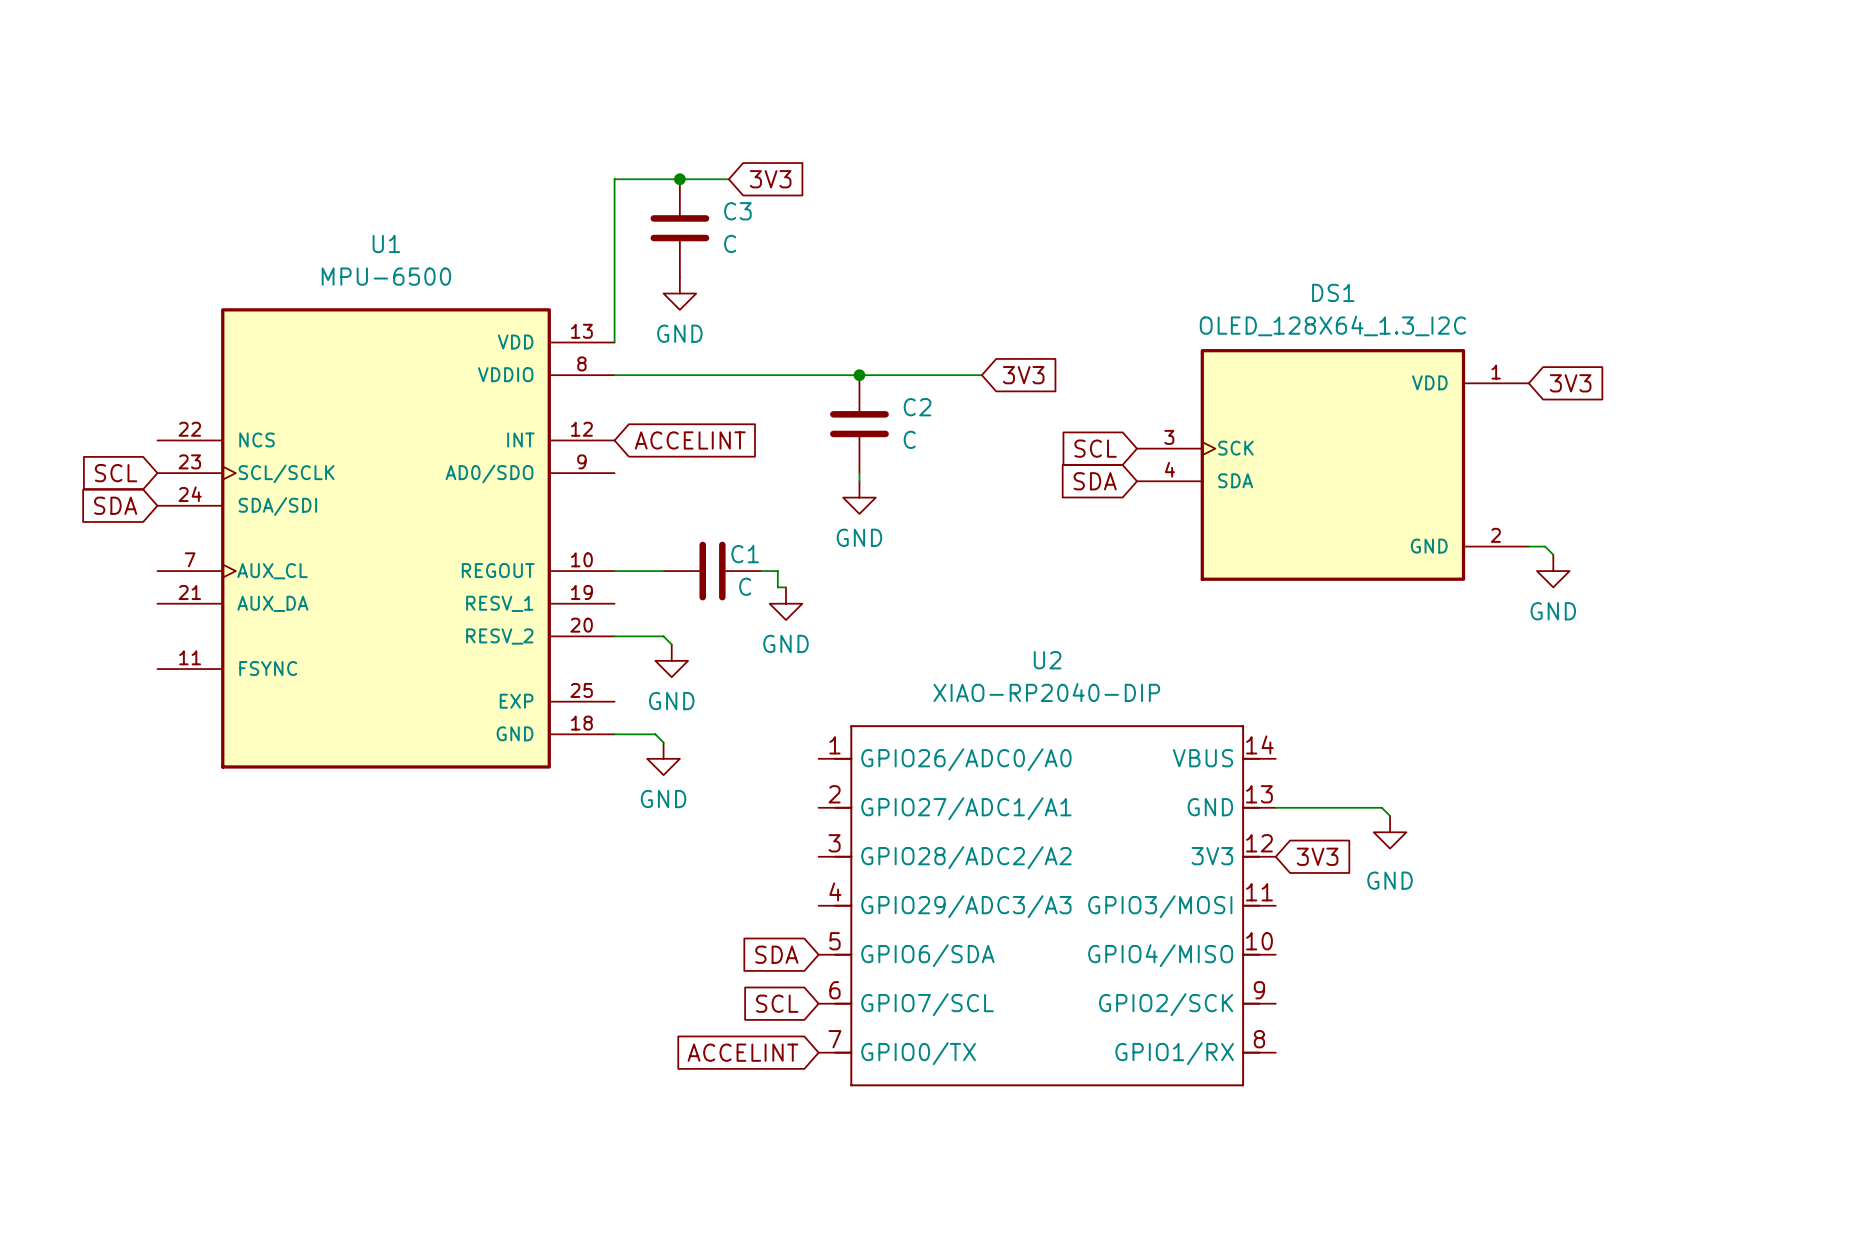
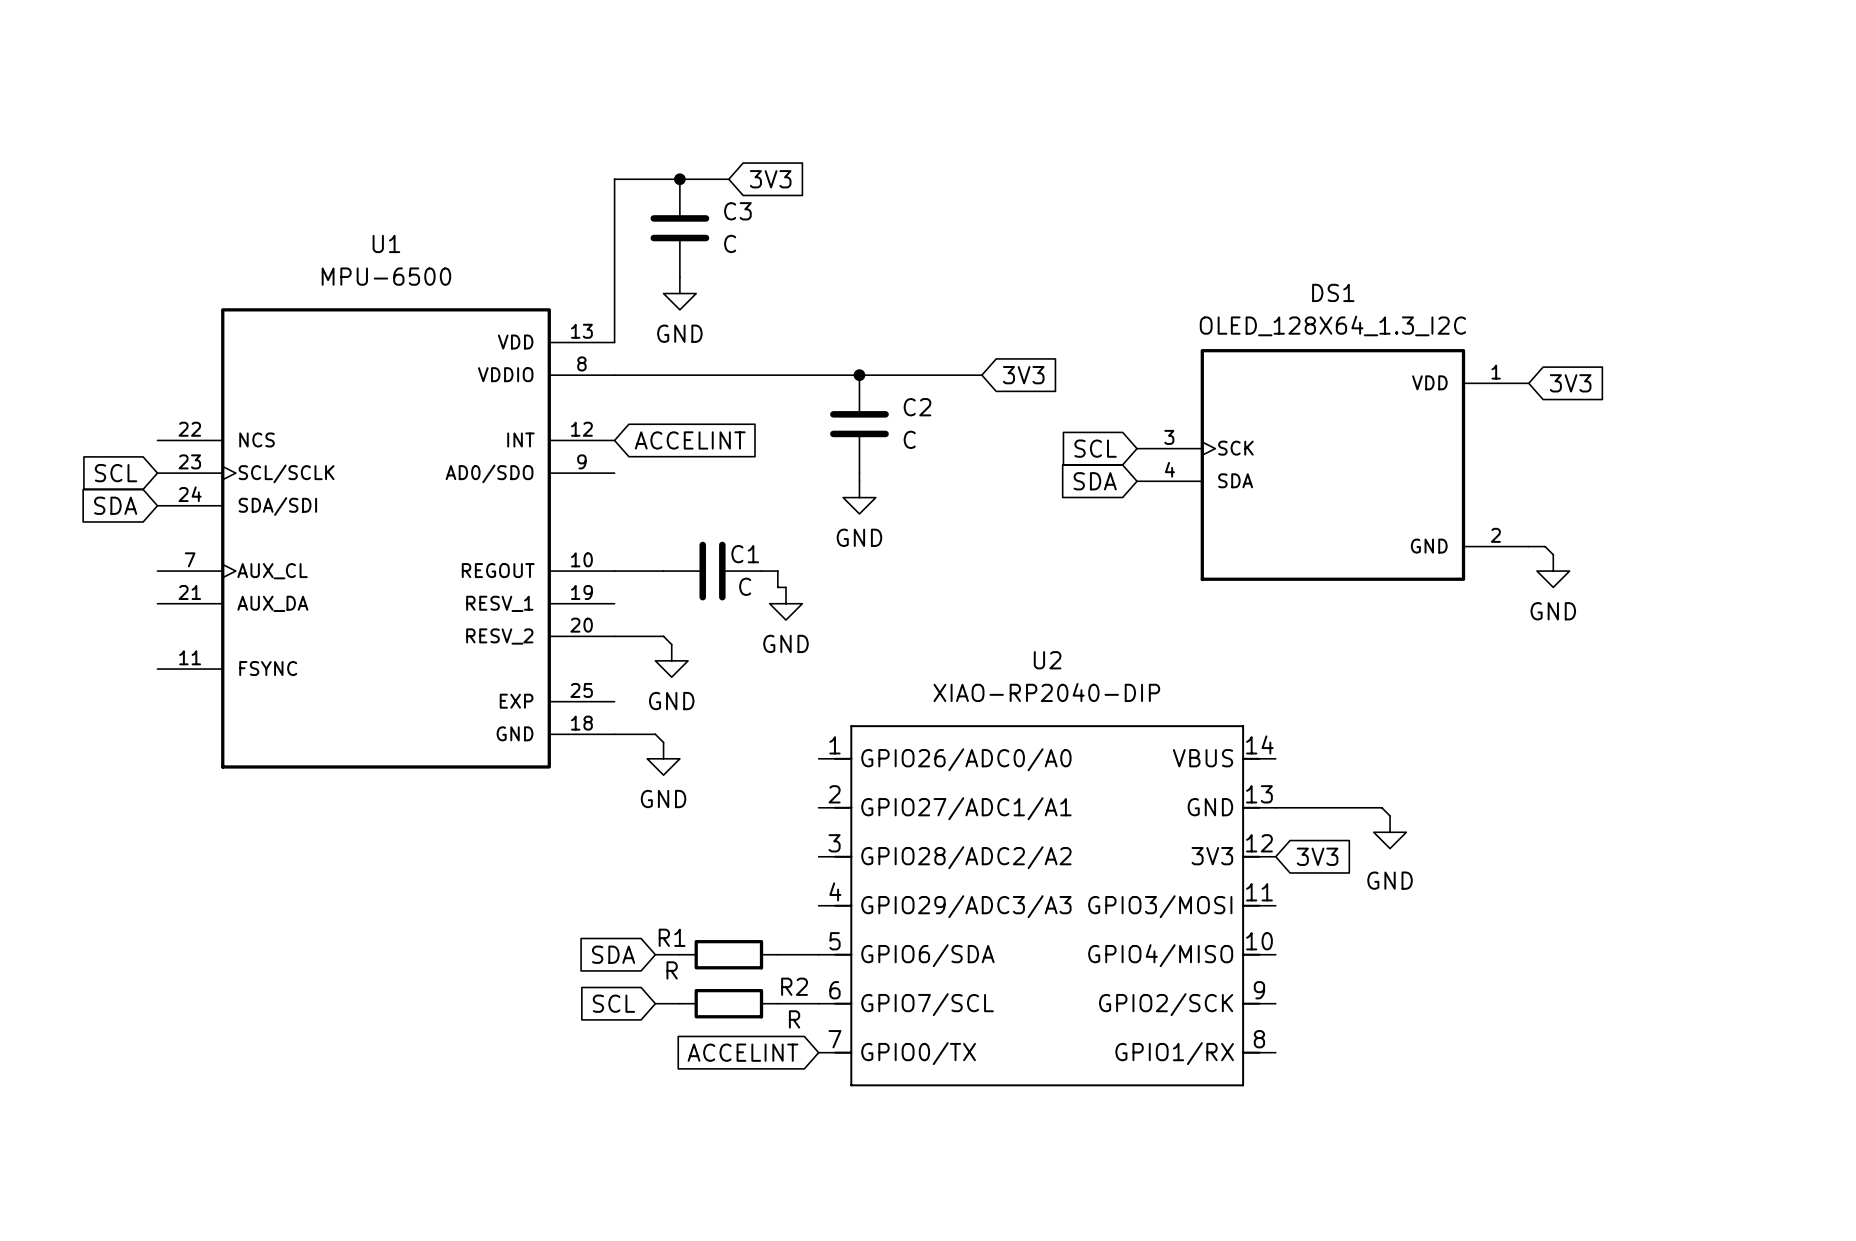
wire: none -> (655, 954) (679, 954)
R1: none -> R (728, 954)
global label position: SDA (776, 954) -> SDA (613, 954)
wire: none -> (777, 954) (818, 954)
wire: none -> (655, 1003) (679, 1003)
R2: none -> R (728, 1003)
wire: none -> (777, 1003) (818, 1003)
global label position: SCL (777, 1003) -> SCL (613, 1003)

